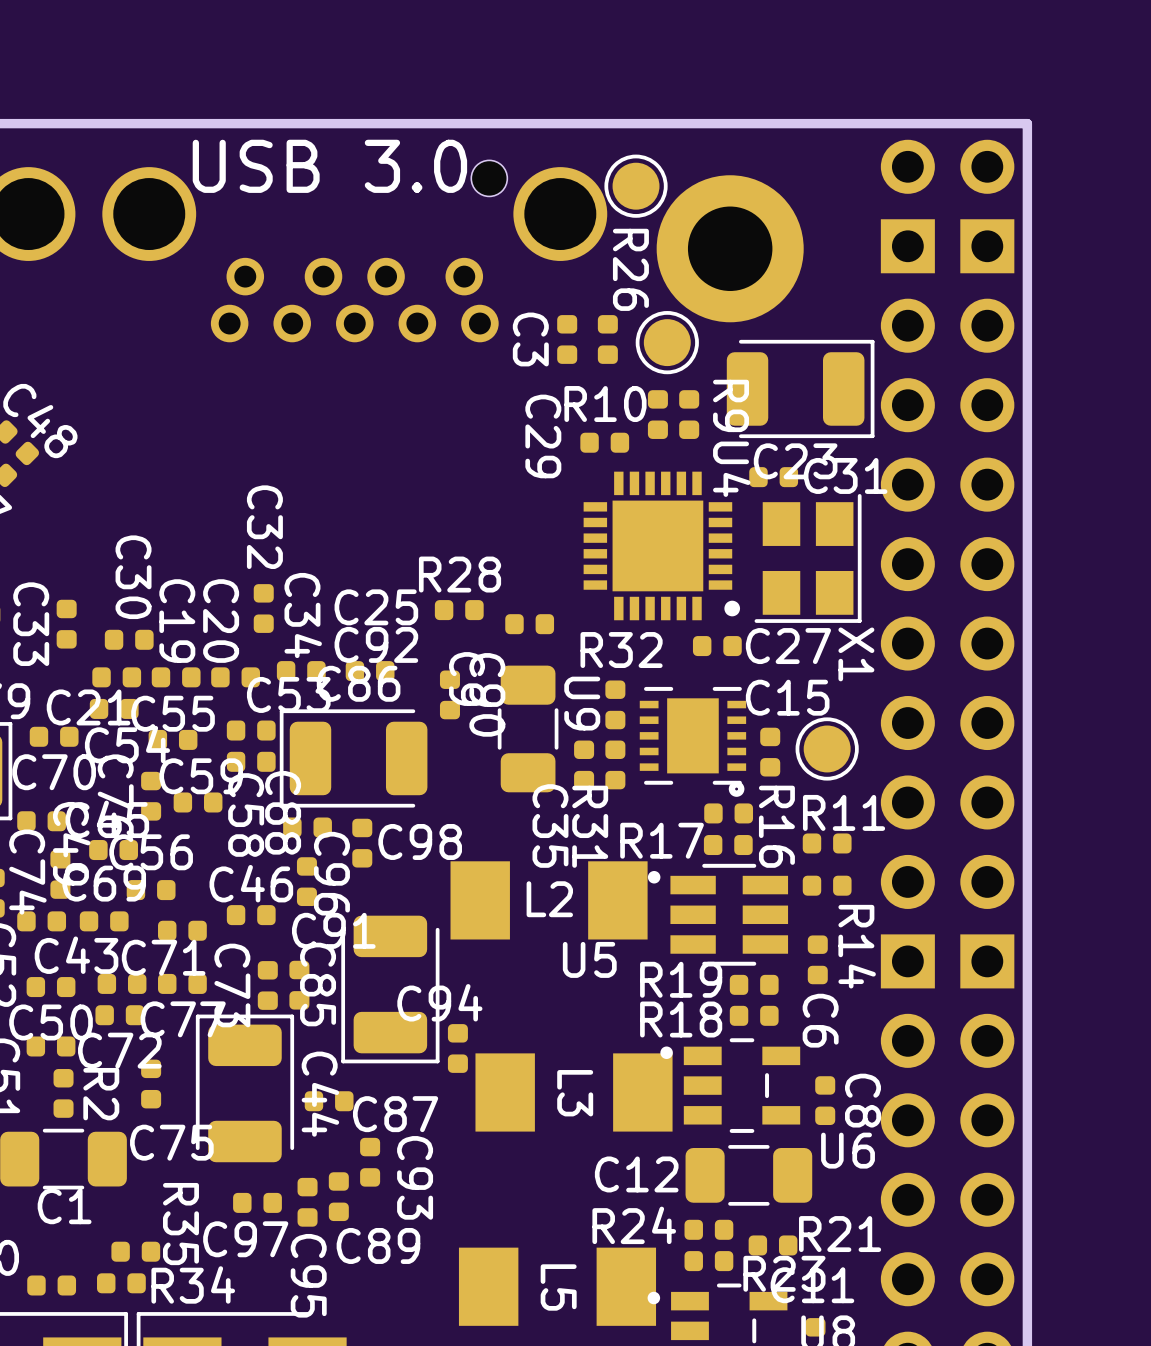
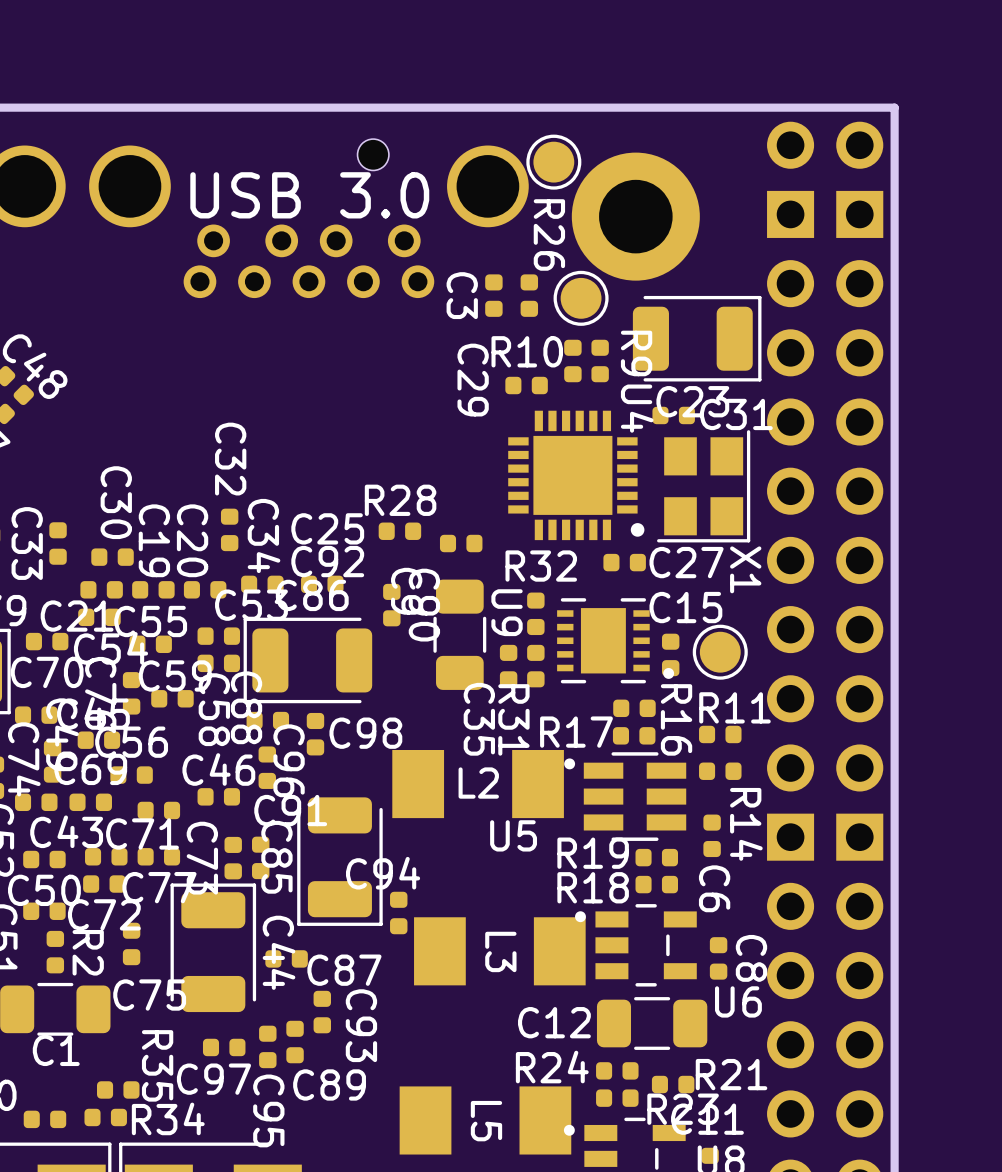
text position: USB 3.0 (329, 166) -> USB 3.0 (309, 195)
part position: (489, 178) -> (373, 154)
U9 footprint: [639, 686, 747, 797] -> [557, 598, 675, 684]

